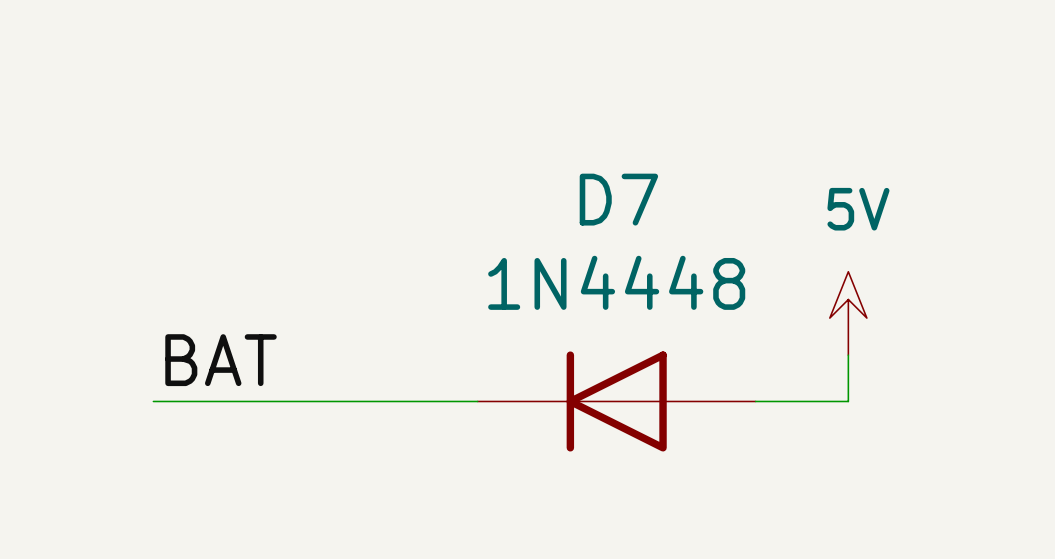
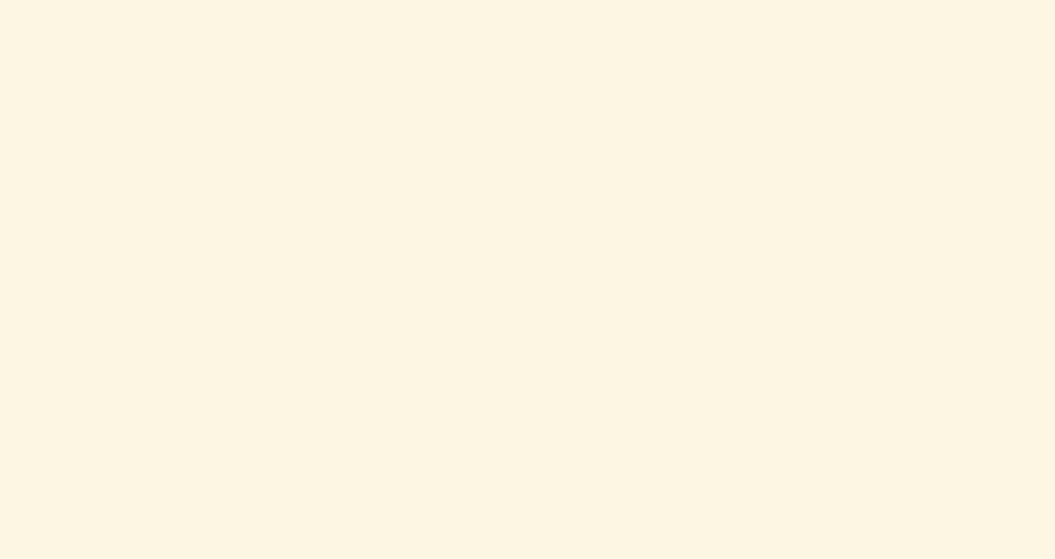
power symbol: 5V (848, 313) -> none
wire: (848, 355) (848, 401) (755, 401) -> none
label: BAT (221, 360) -> none
wire: (153, 401) (477, 401) -> none
D7: 1N4448 (616, 401) -> none

